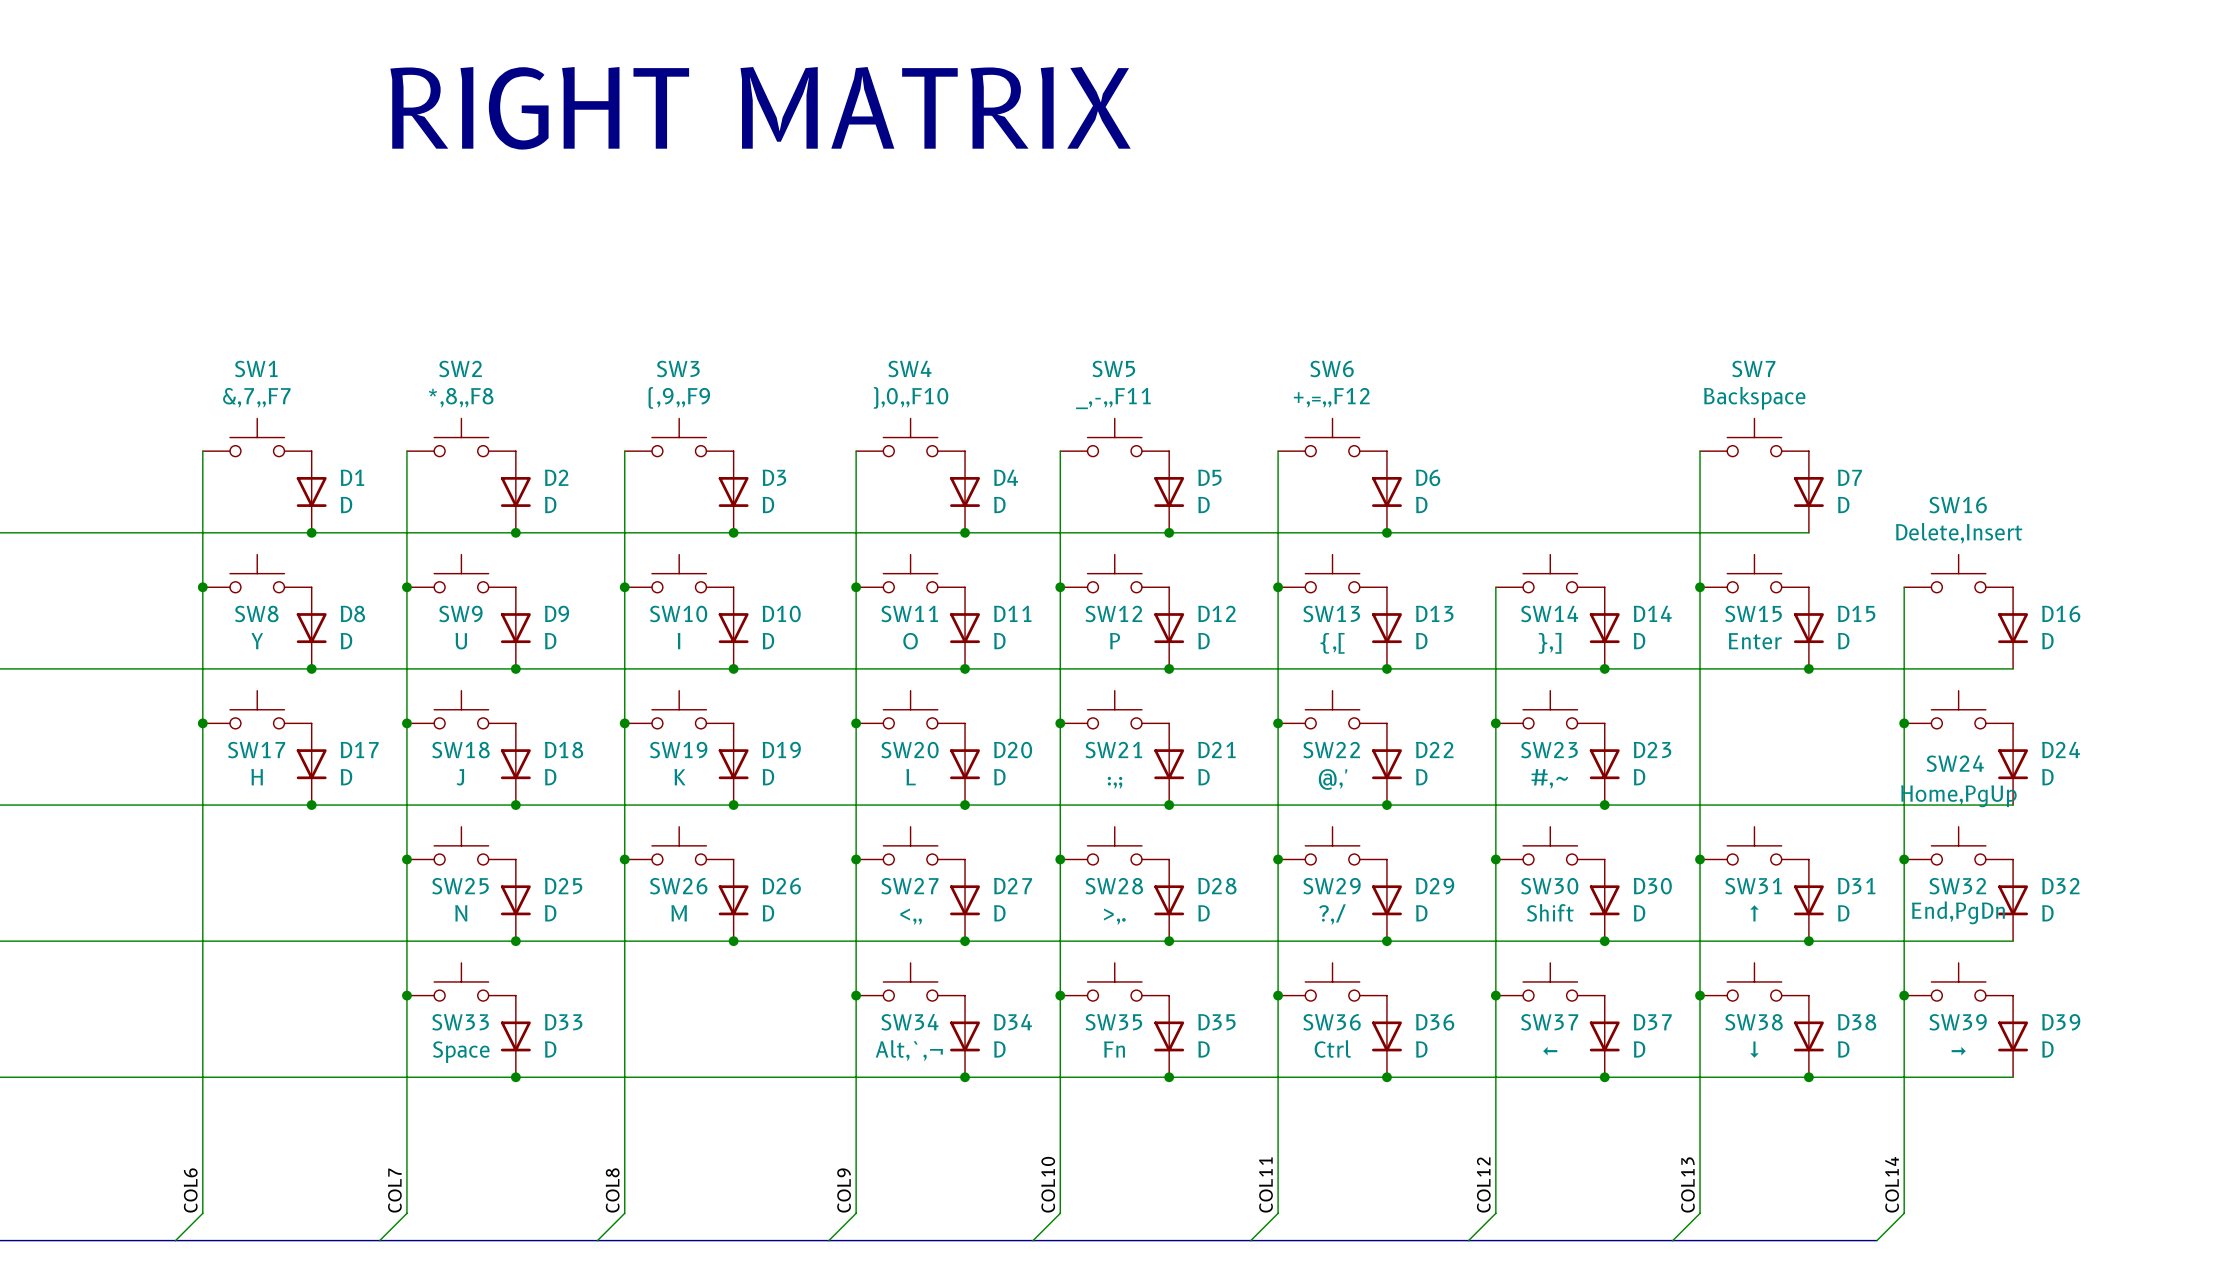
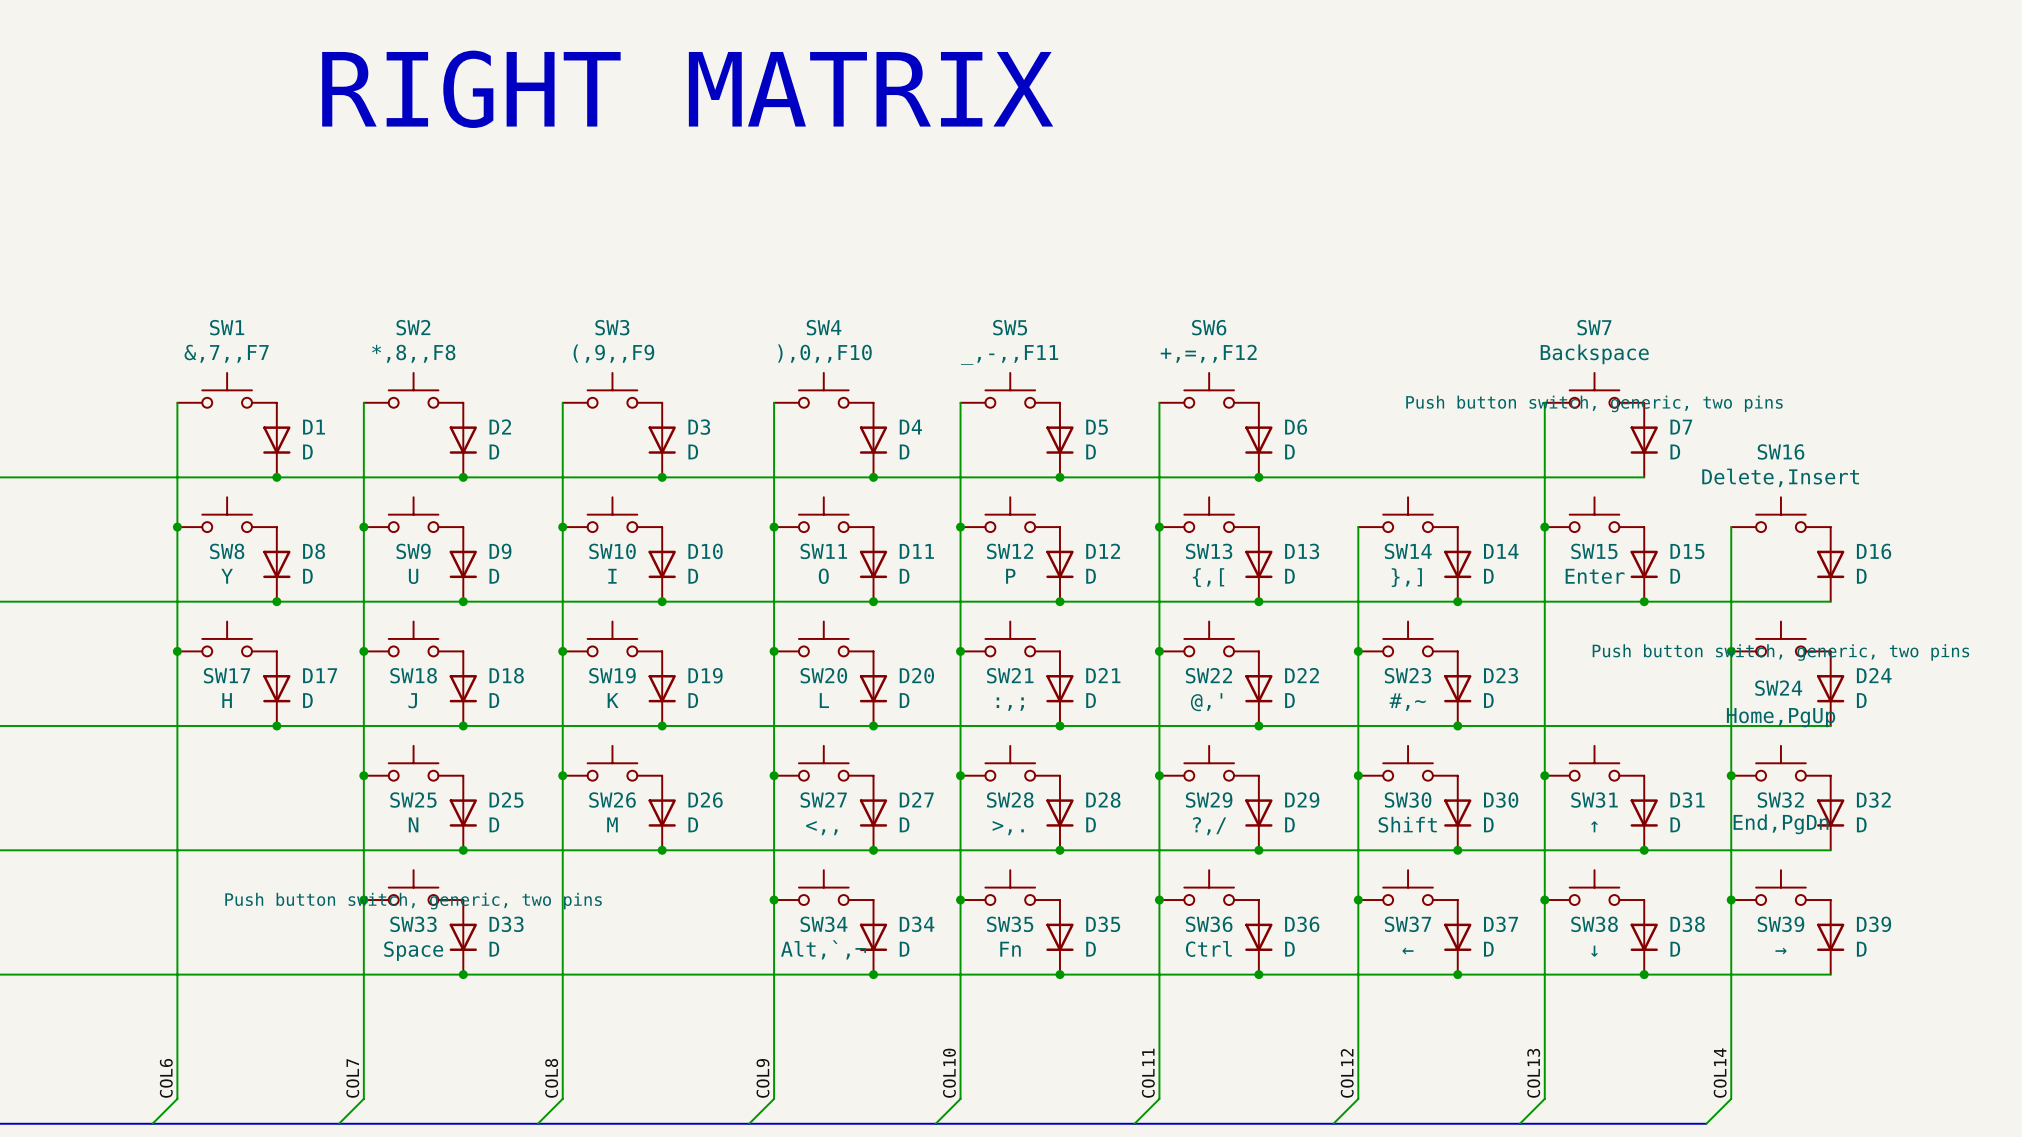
SW7 text: none -> Push button switch, generic, two pins (1594, 403)
SW24 text: none -> Push button switch, generic, two pins (1780, 652)
SW33 text: none -> Push button switch, generic, two pins (413, 901)

